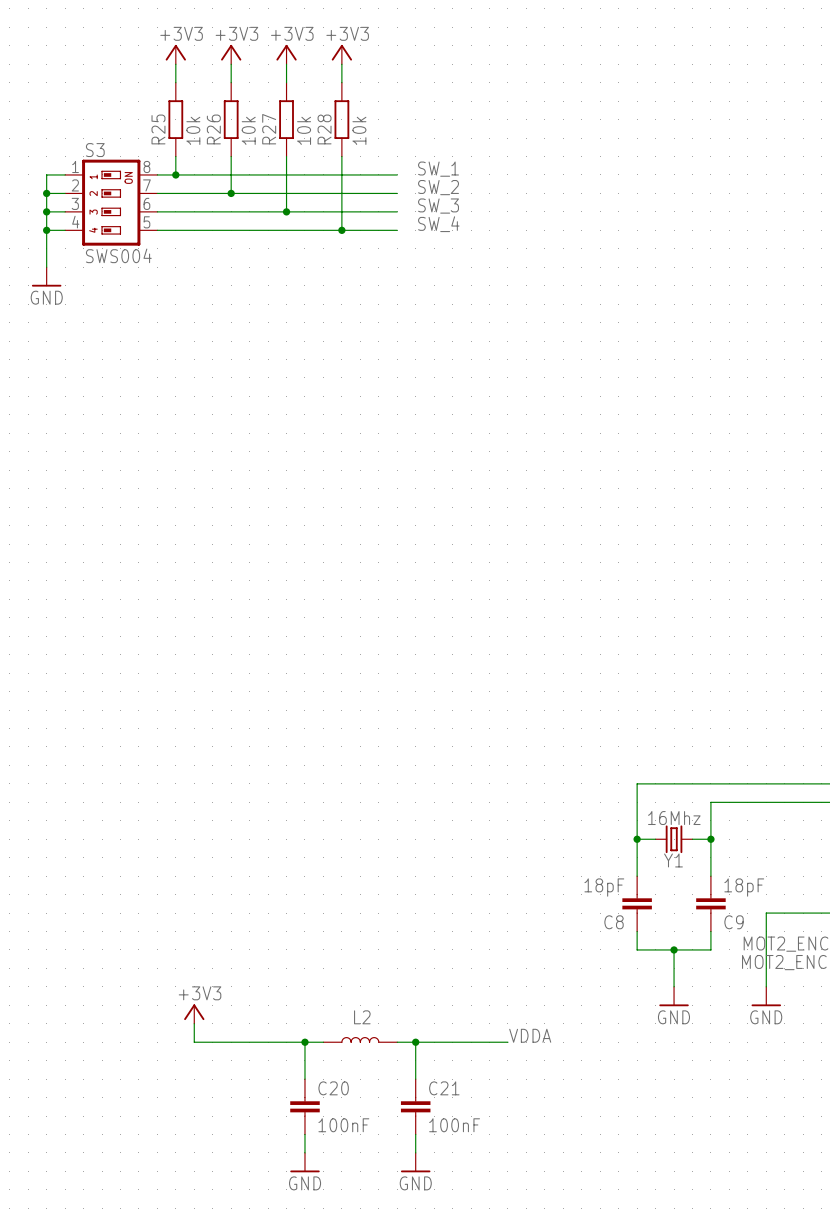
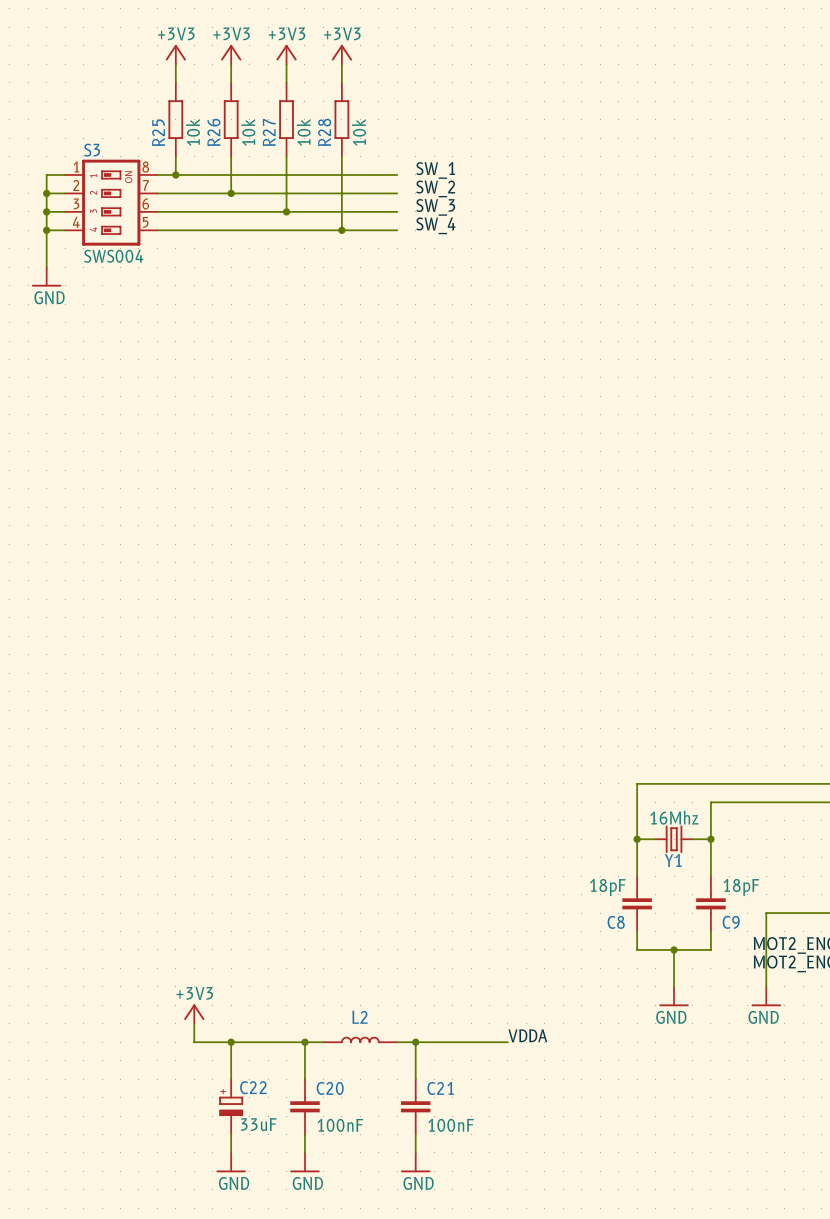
wire: none -> (231, 1042) (231, 1079)
junction: none -> (231, 1042)
C22: none -> 33uF (231, 1106)
wire: none -> (231, 1134) (231, 1152)
power symbol: none -> GND (231, 1162)

